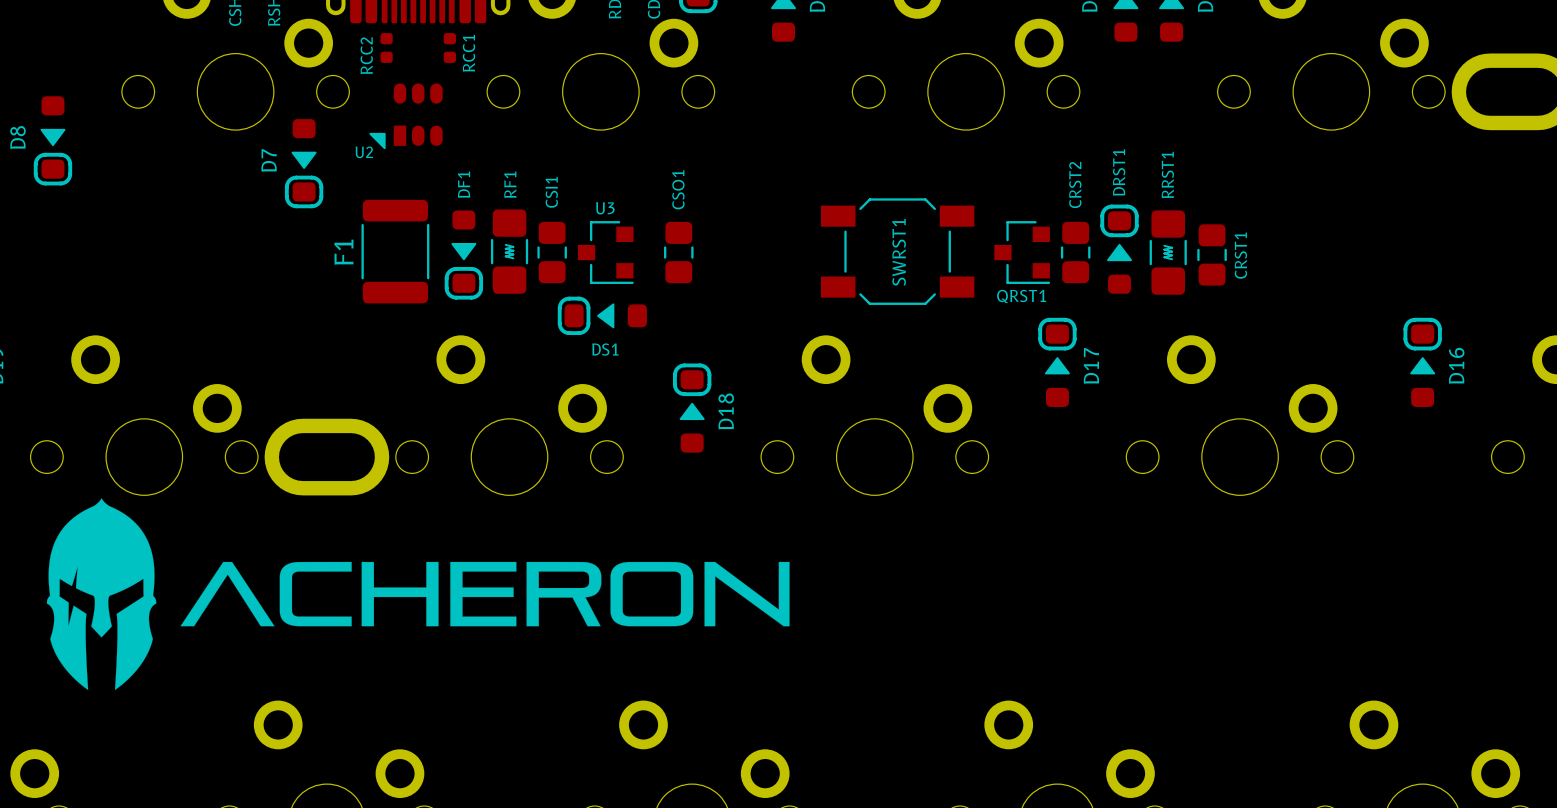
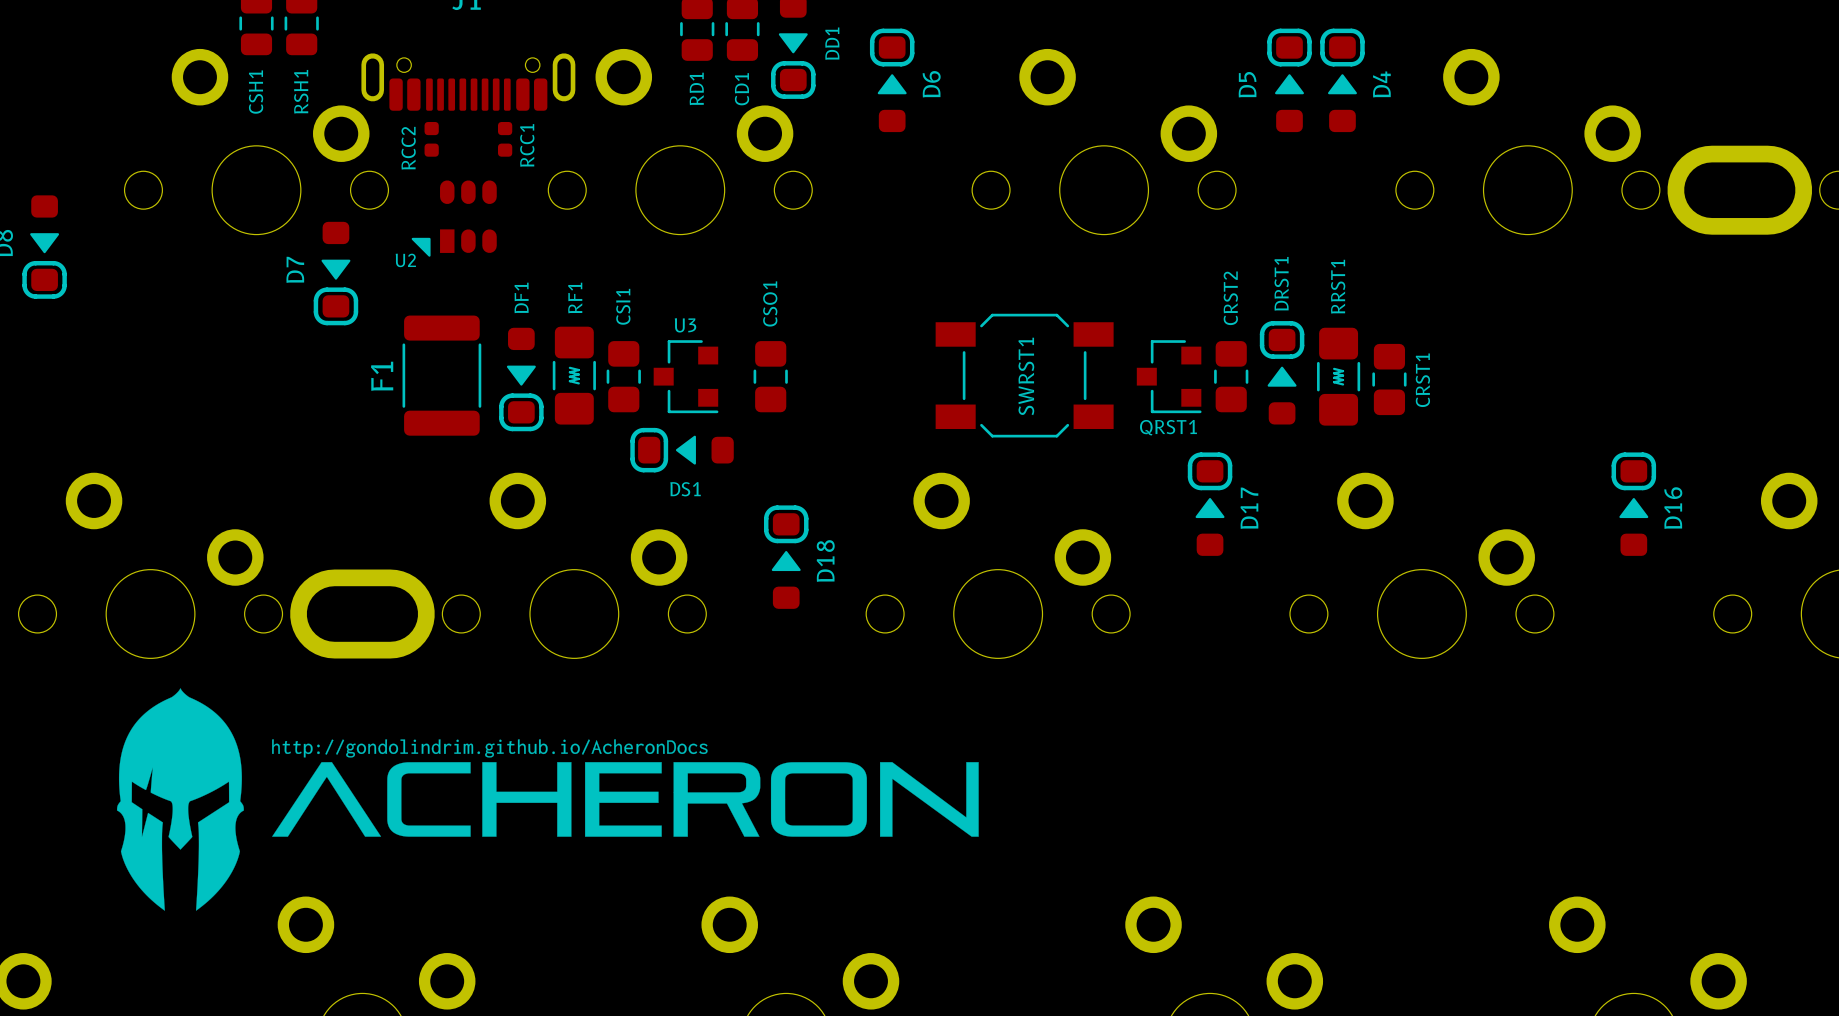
drawing: [46, 498, 790, 690] -> none
drawing: none -> [116, 688, 979, 911]

